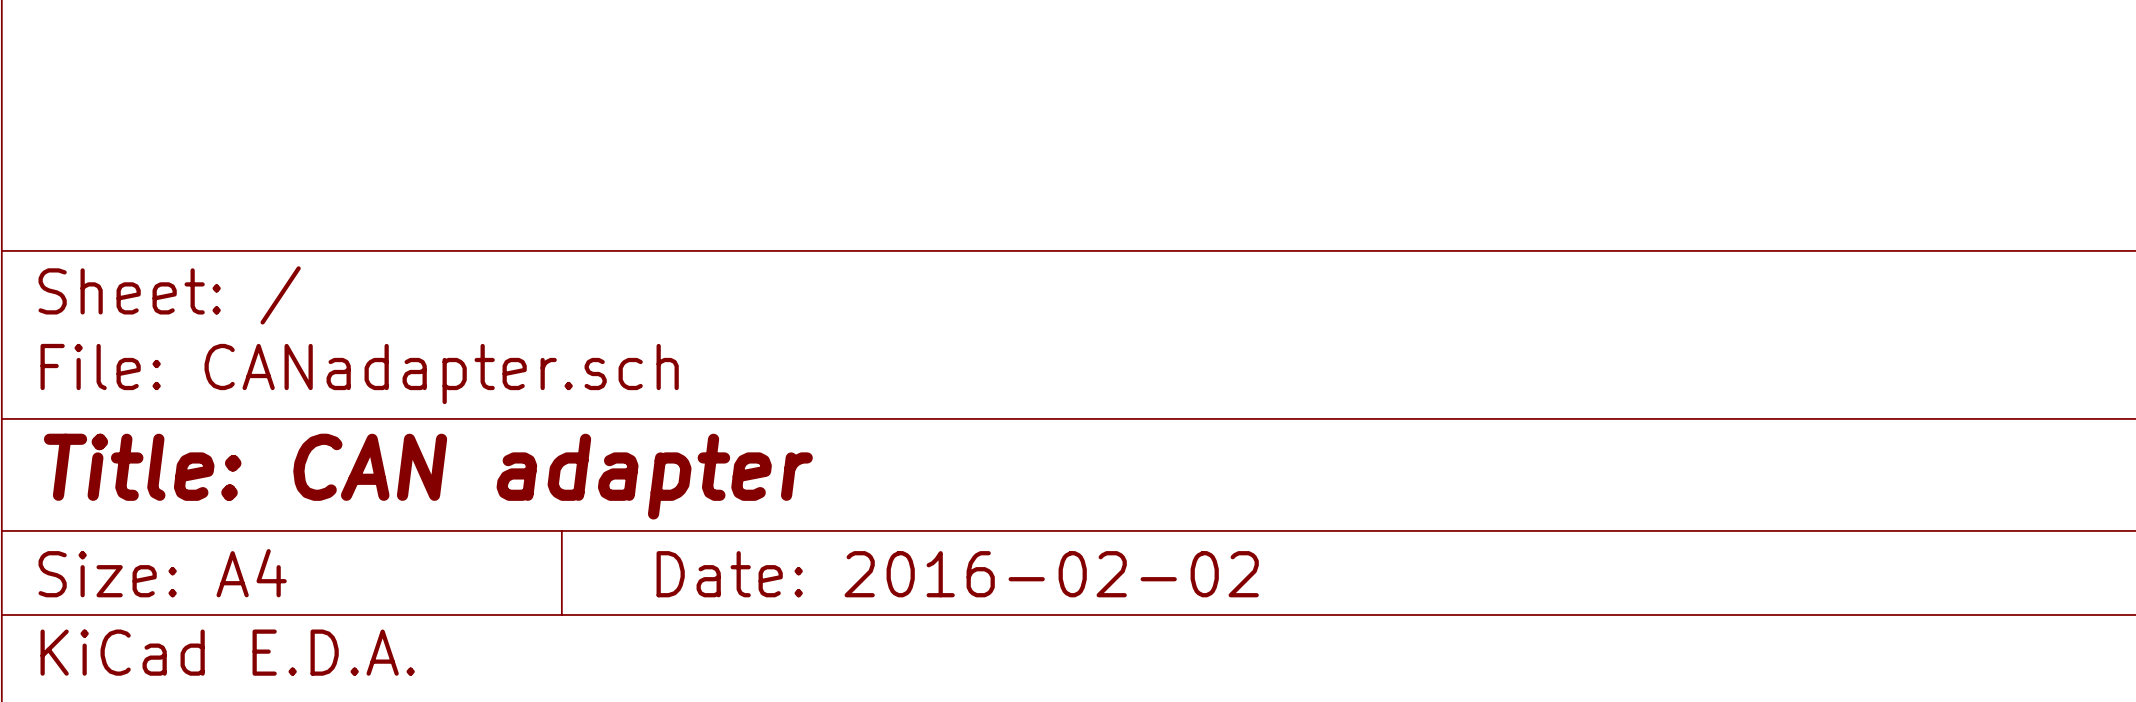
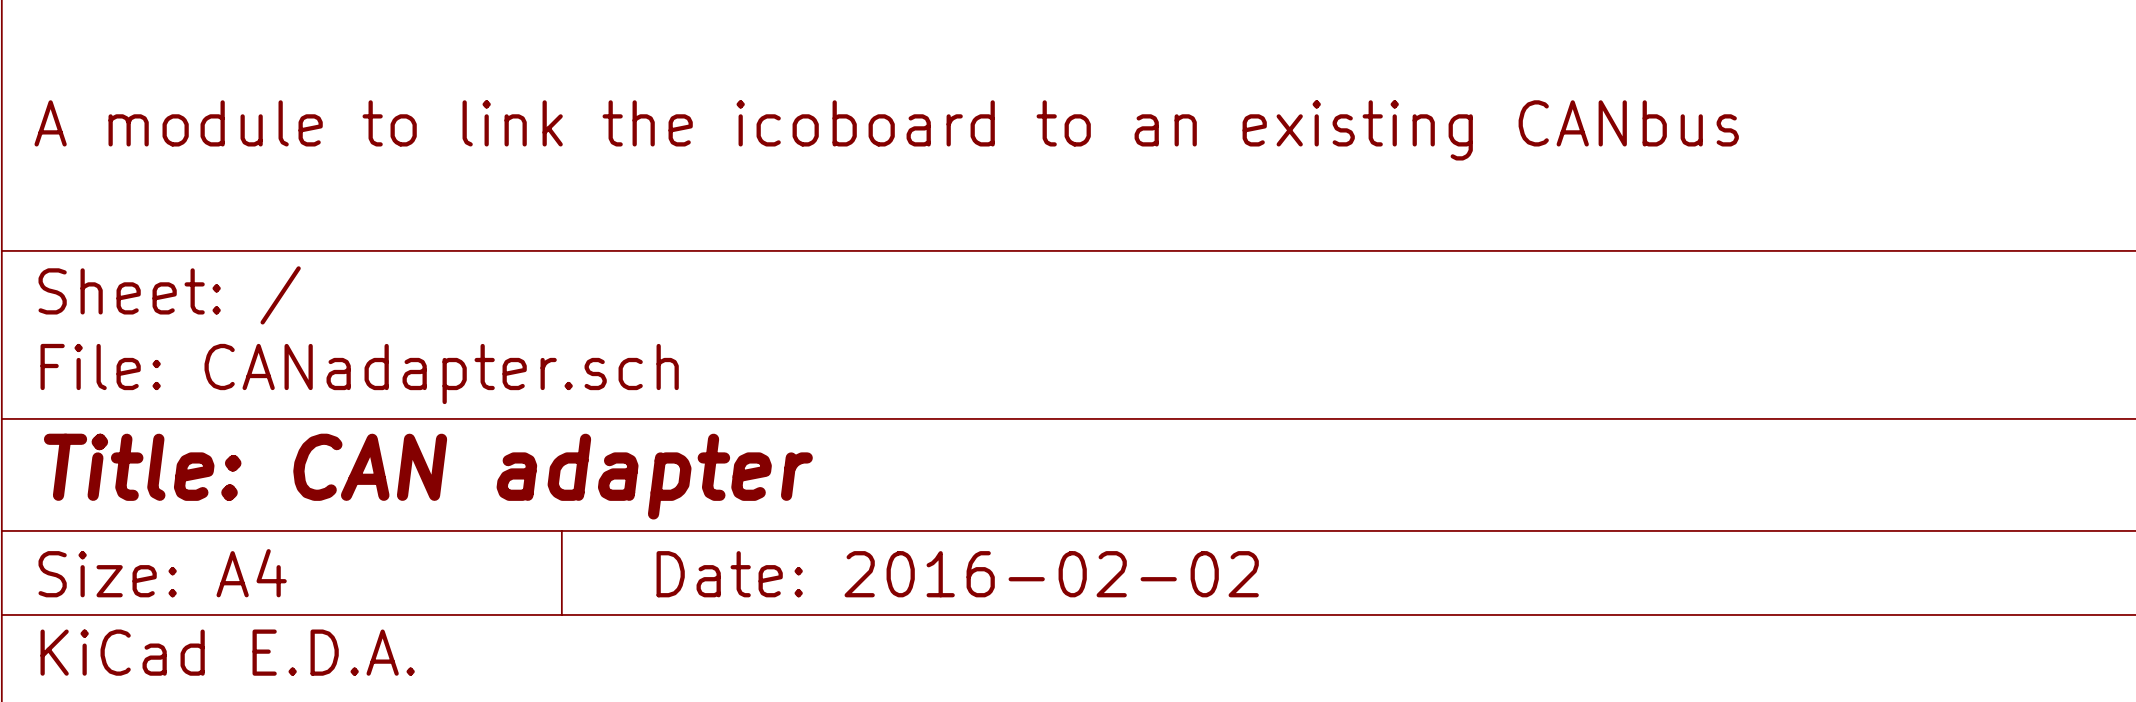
title block: none -> A module to link the icoboard to an existing CANbus (886, 130)

